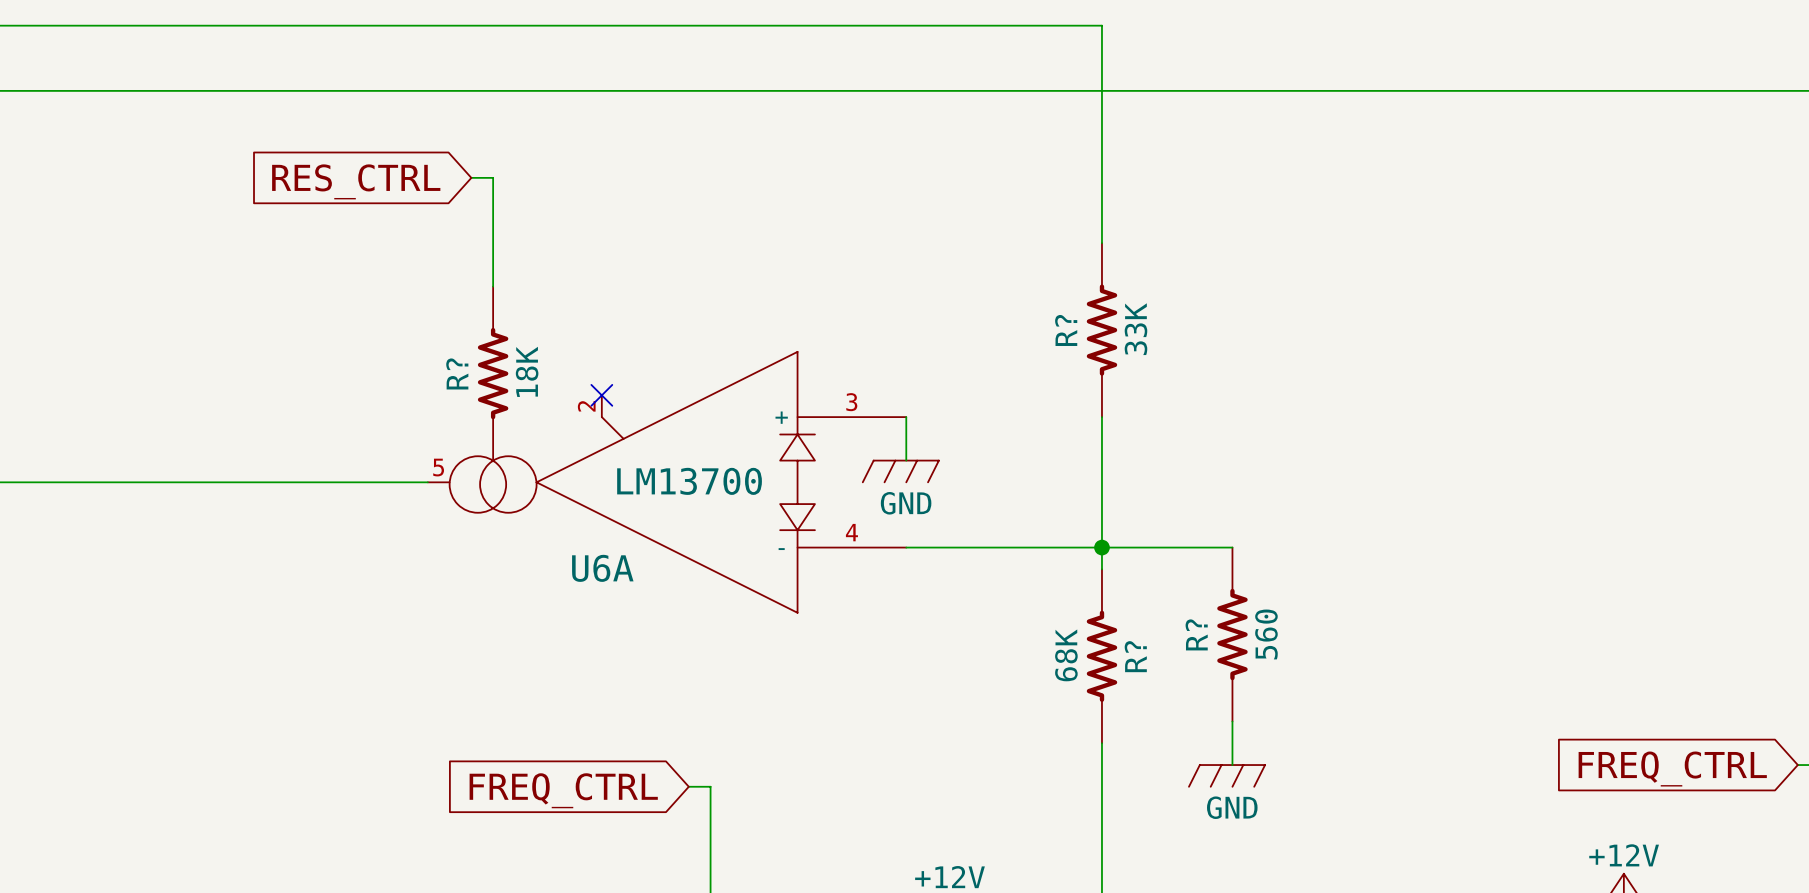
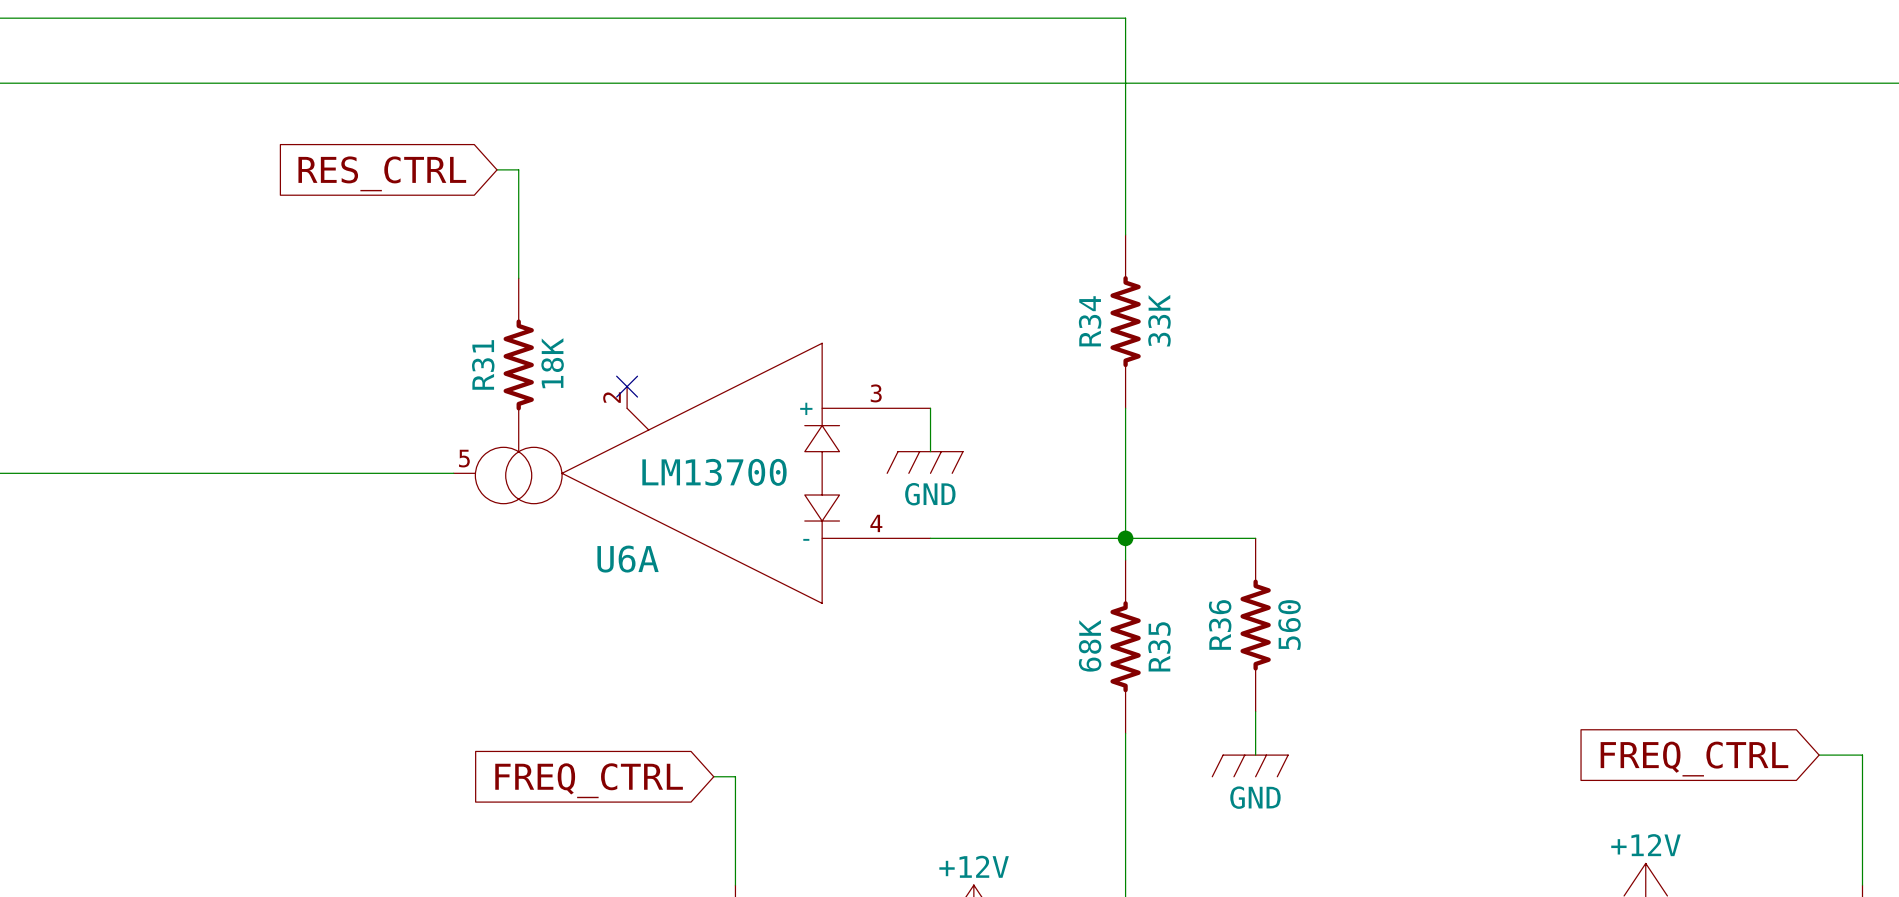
R? name: R? (1066, 330) -> R34 (1090, 321)
R? name: R? (457, 373) -> R31 (483, 364)
R? name: R? (1196, 634) -> R36 (1220, 624)
R? name: R? (1135, 656) -> R35 (1159, 646)

